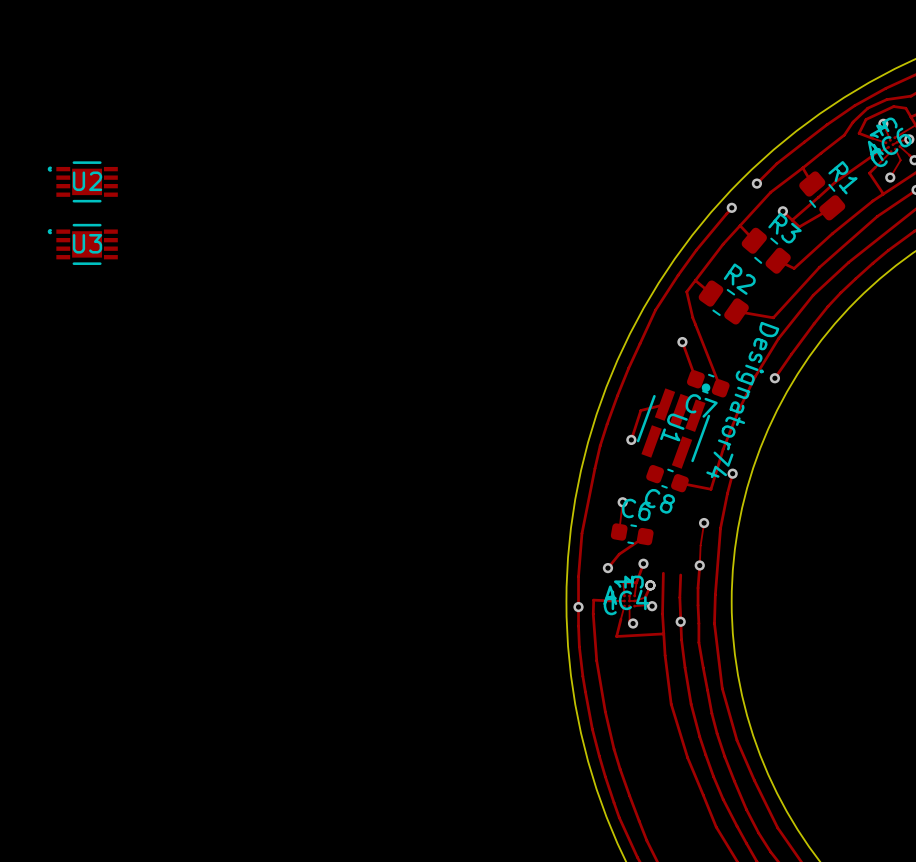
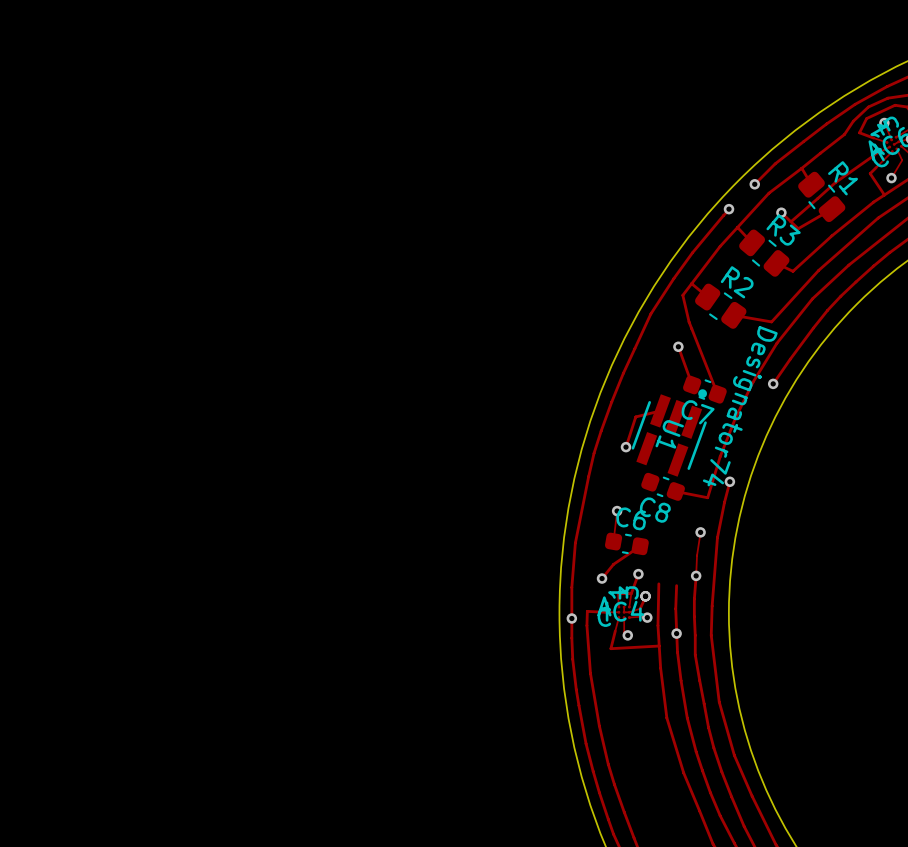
U2: (82, 181) -> none
U3: (82, 244) -> none

